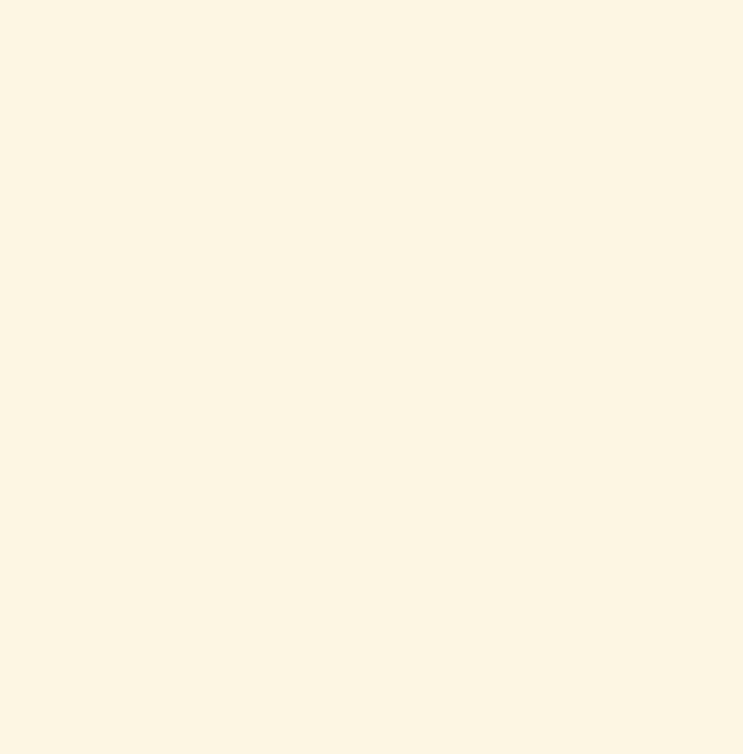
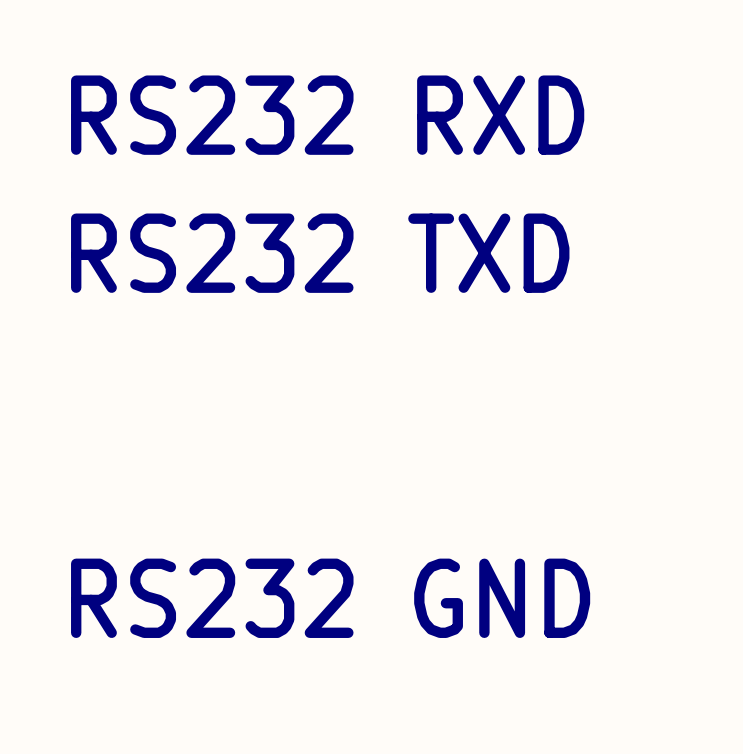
text: none -> RS232 RXD (327, 115)
text: none -> RS232 TXD (320, 253)
text: none -> RS232 GND (330, 598)

